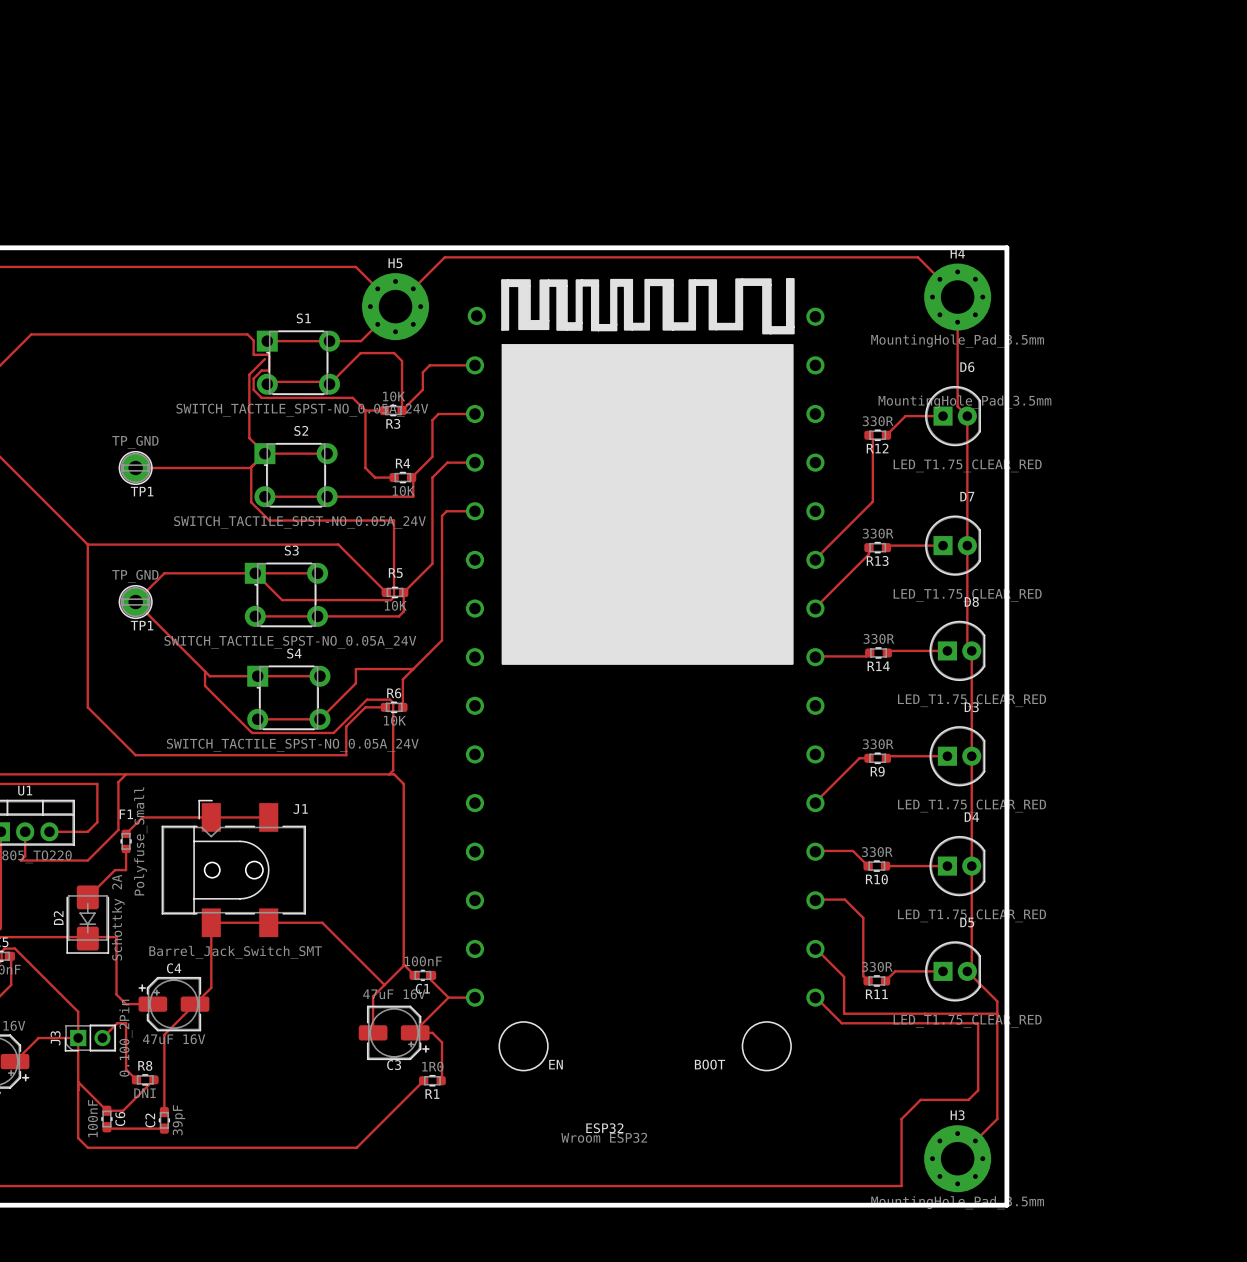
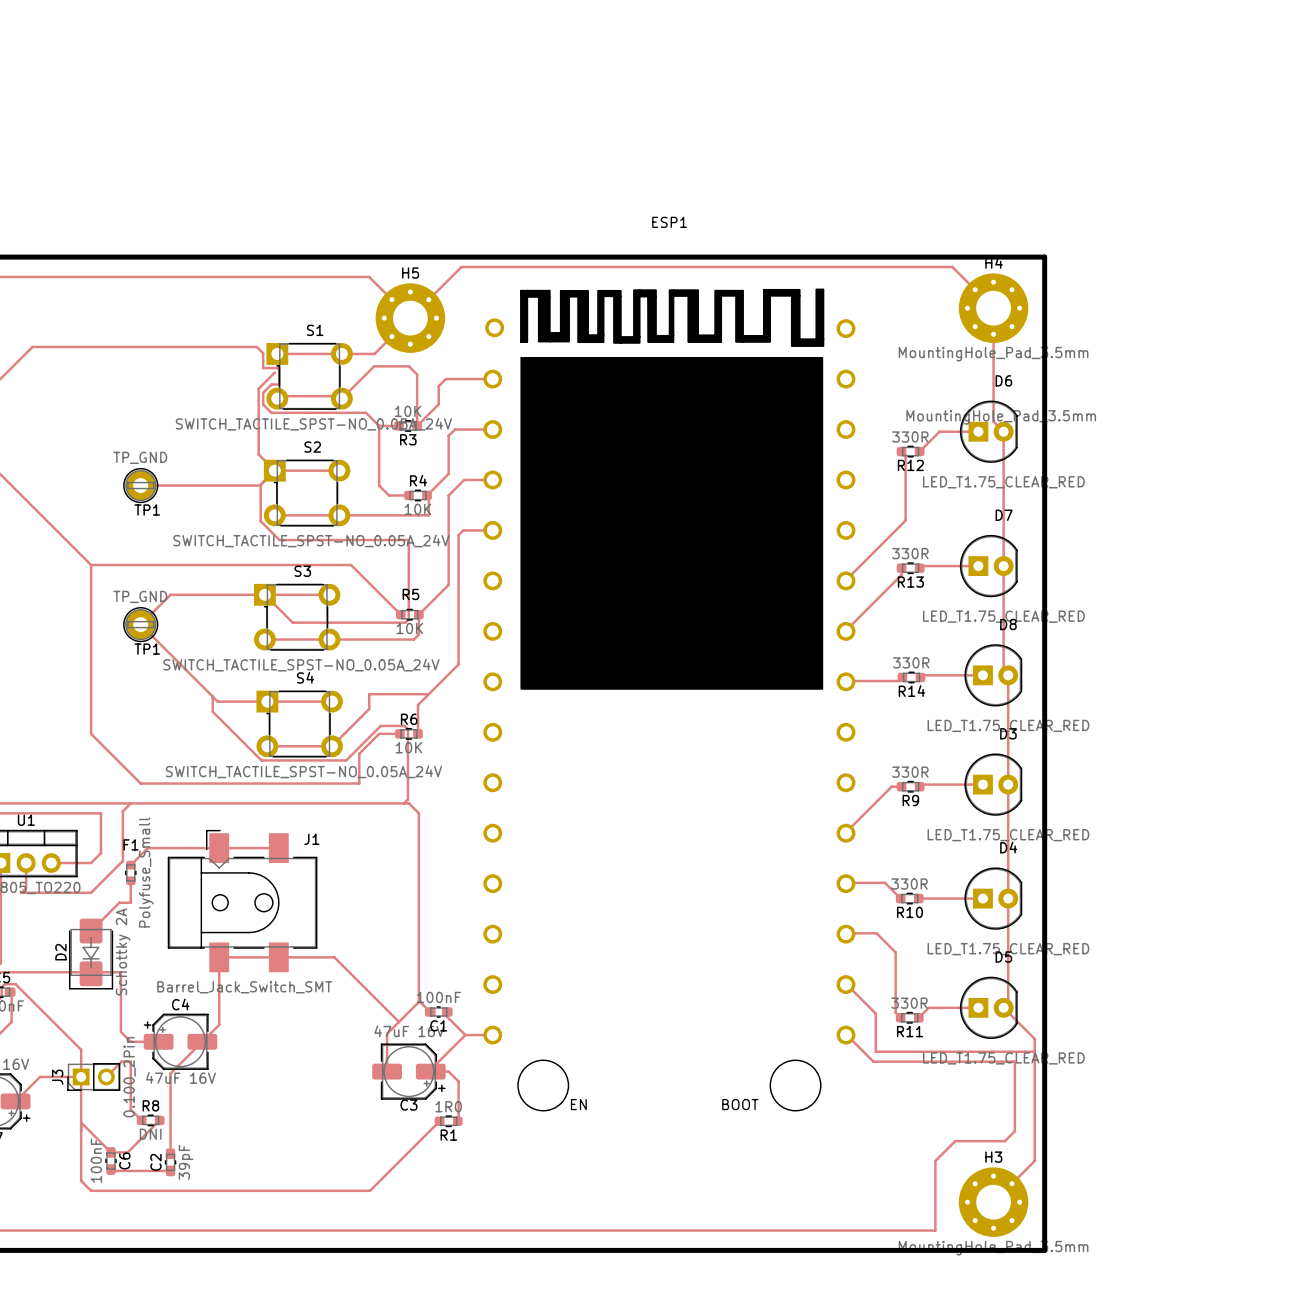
ESP32 name: ESP32 (604, 1128) -> ESP1 (669, 222)
ESP32 value: Wroom ESP32 (604, 1137) -> none

